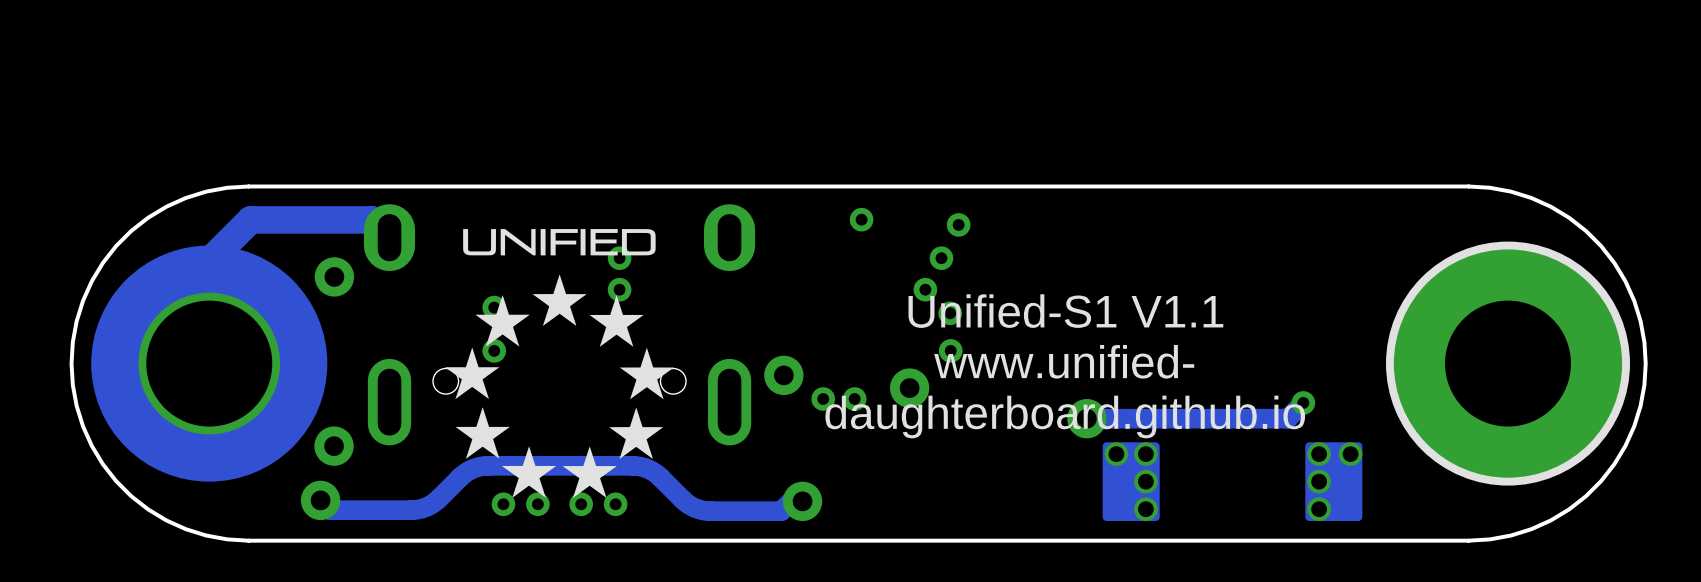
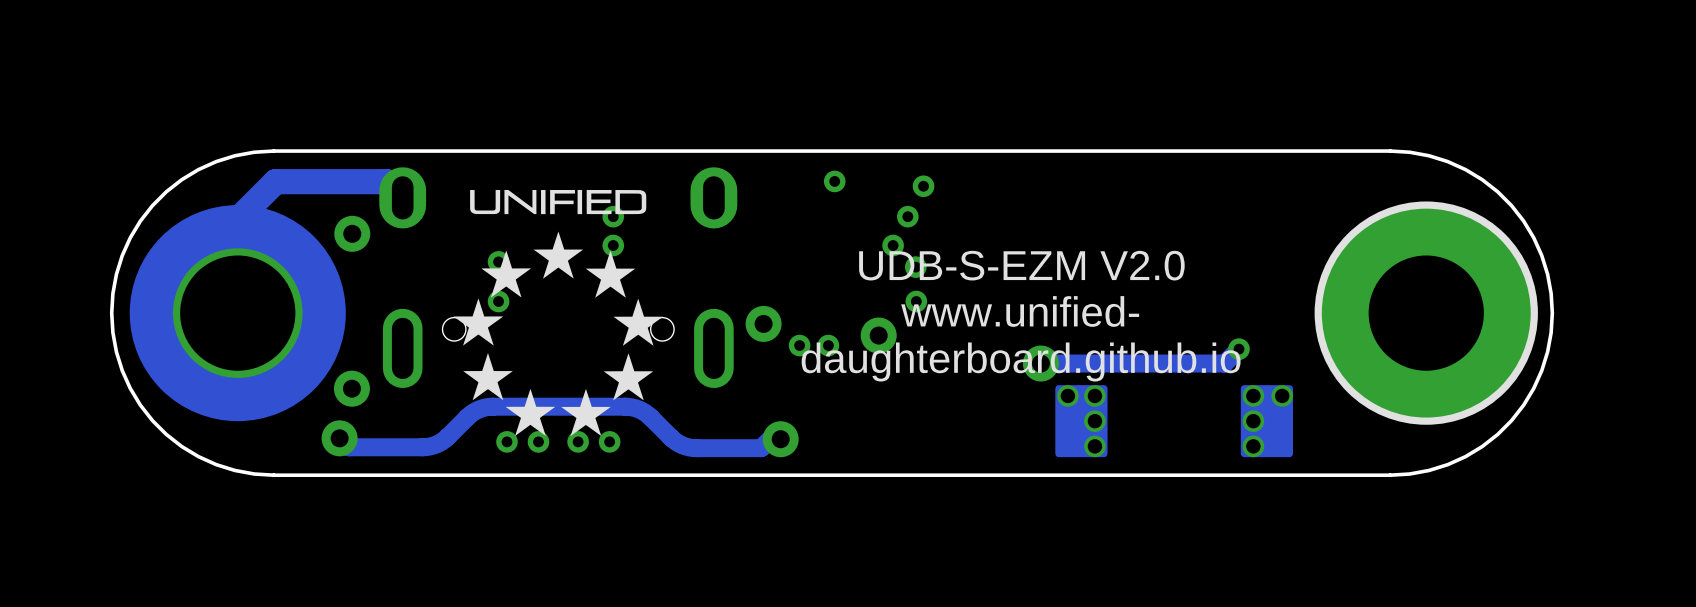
text: Unified-S1 V1.1 (1065, 311) -> UDB-S-EZM V2.0 (1021, 265)

